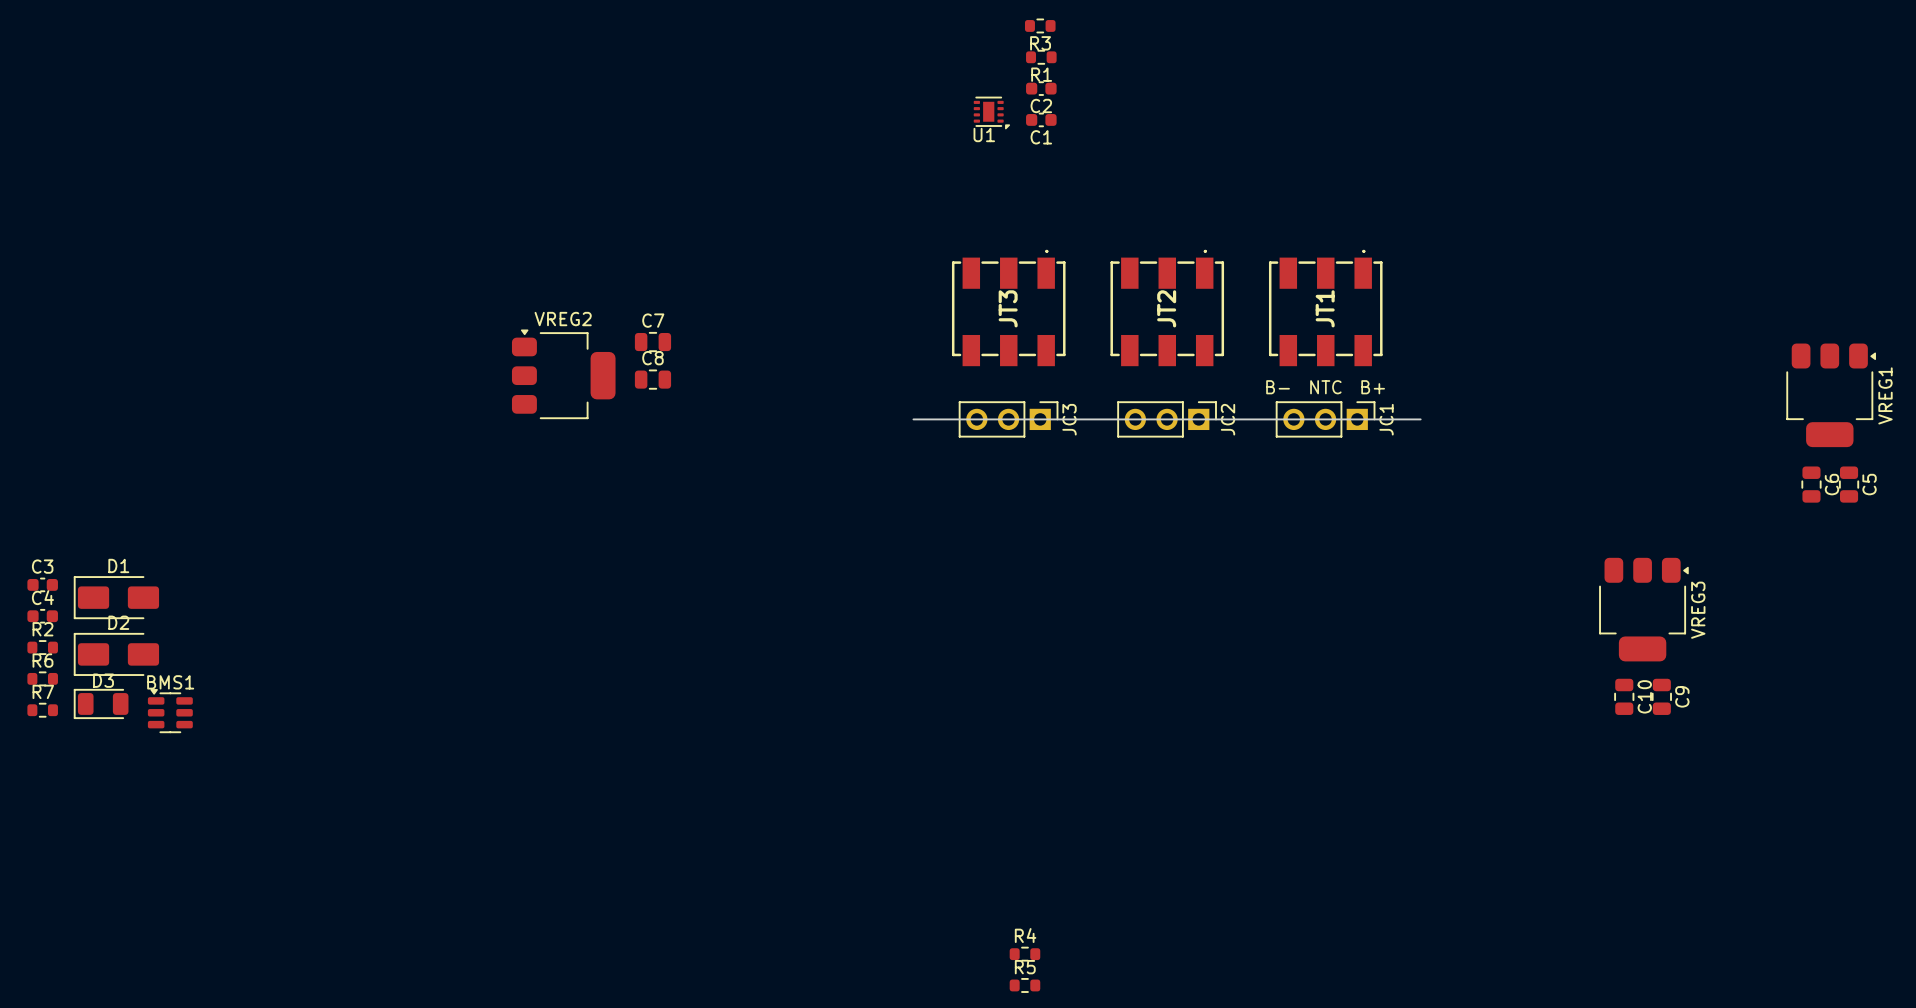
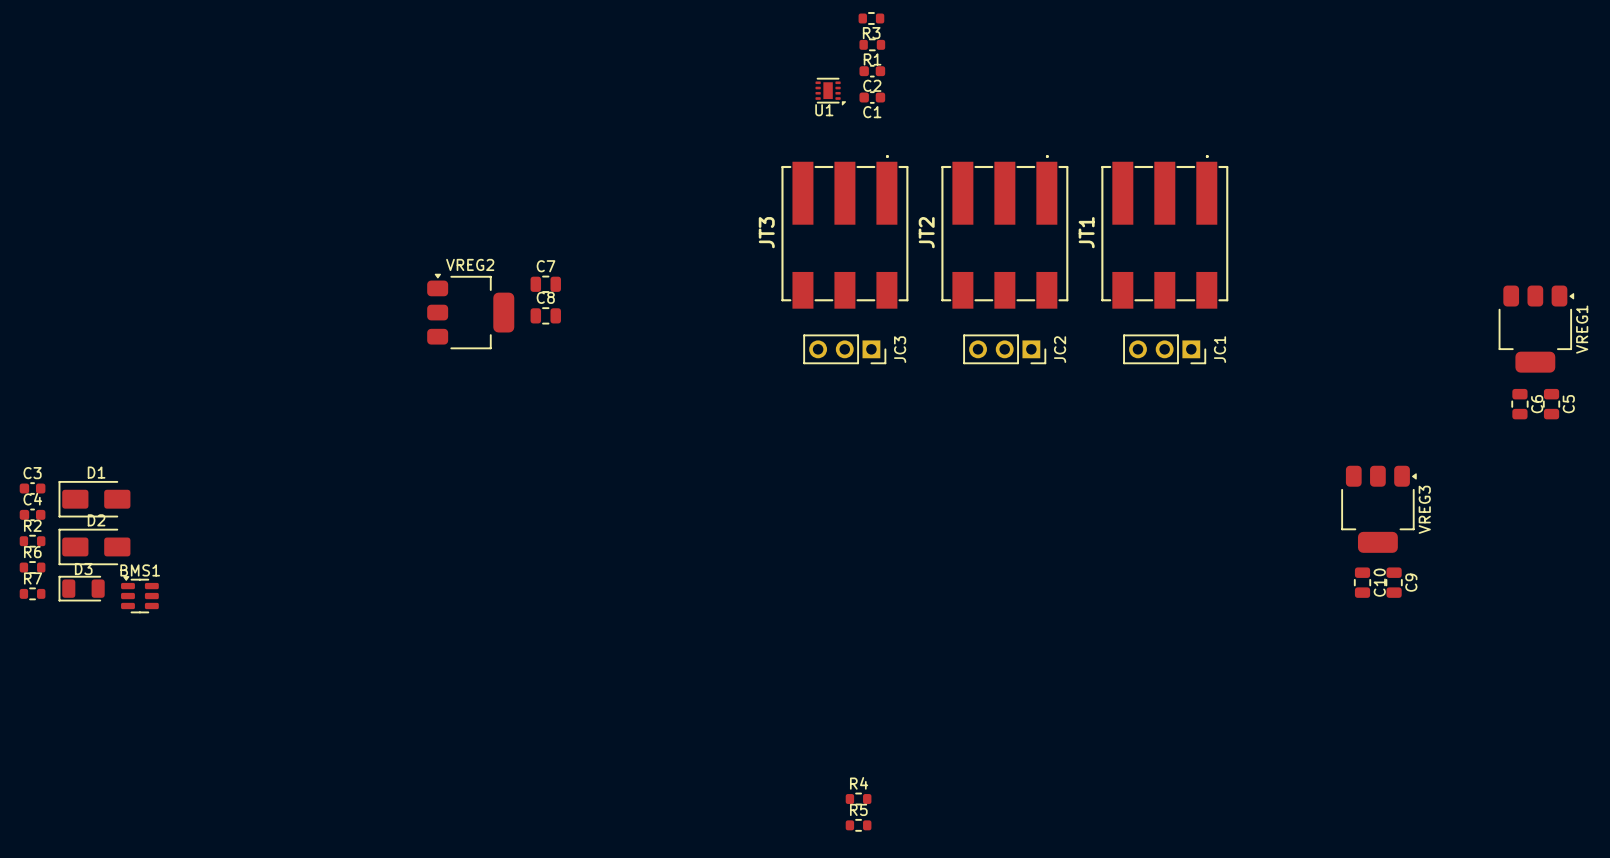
JT3 footprint: [951, 250, 1066, 367] -> [781, 155, 909, 309]
JT2 footprint: [1110, 250, 1225, 367] -> [941, 155, 1069, 309]
JT1 footprint: [1268, 250, 1383, 367] -> [1101, 155, 1229, 309]
JT3 name position: JT3 (1008, 308) -> JT3 (766, 232)
JT2 name position: JT2 (1166, 308) -> JT2 (926, 232)
JT1 name position: JT1 (1325, 308) -> JT1 (1086, 232)
text: B- (1278, 387) -> none
text: NTC (1325, 387) -> none
text: B+ (1373, 387) -> none
JC3 footprint: [958, 401, 1059, 438] -> [803, 334, 887, 364]
JC2 footprint: [1117, 401, 1217, 438] -> [963, 334, 1046, 364]
JC1 footprint: [1275, 401, 1376, 438] -> [1123, 334, 1206, 364]
board edge: (913, 419) (1420, 419) -> none

